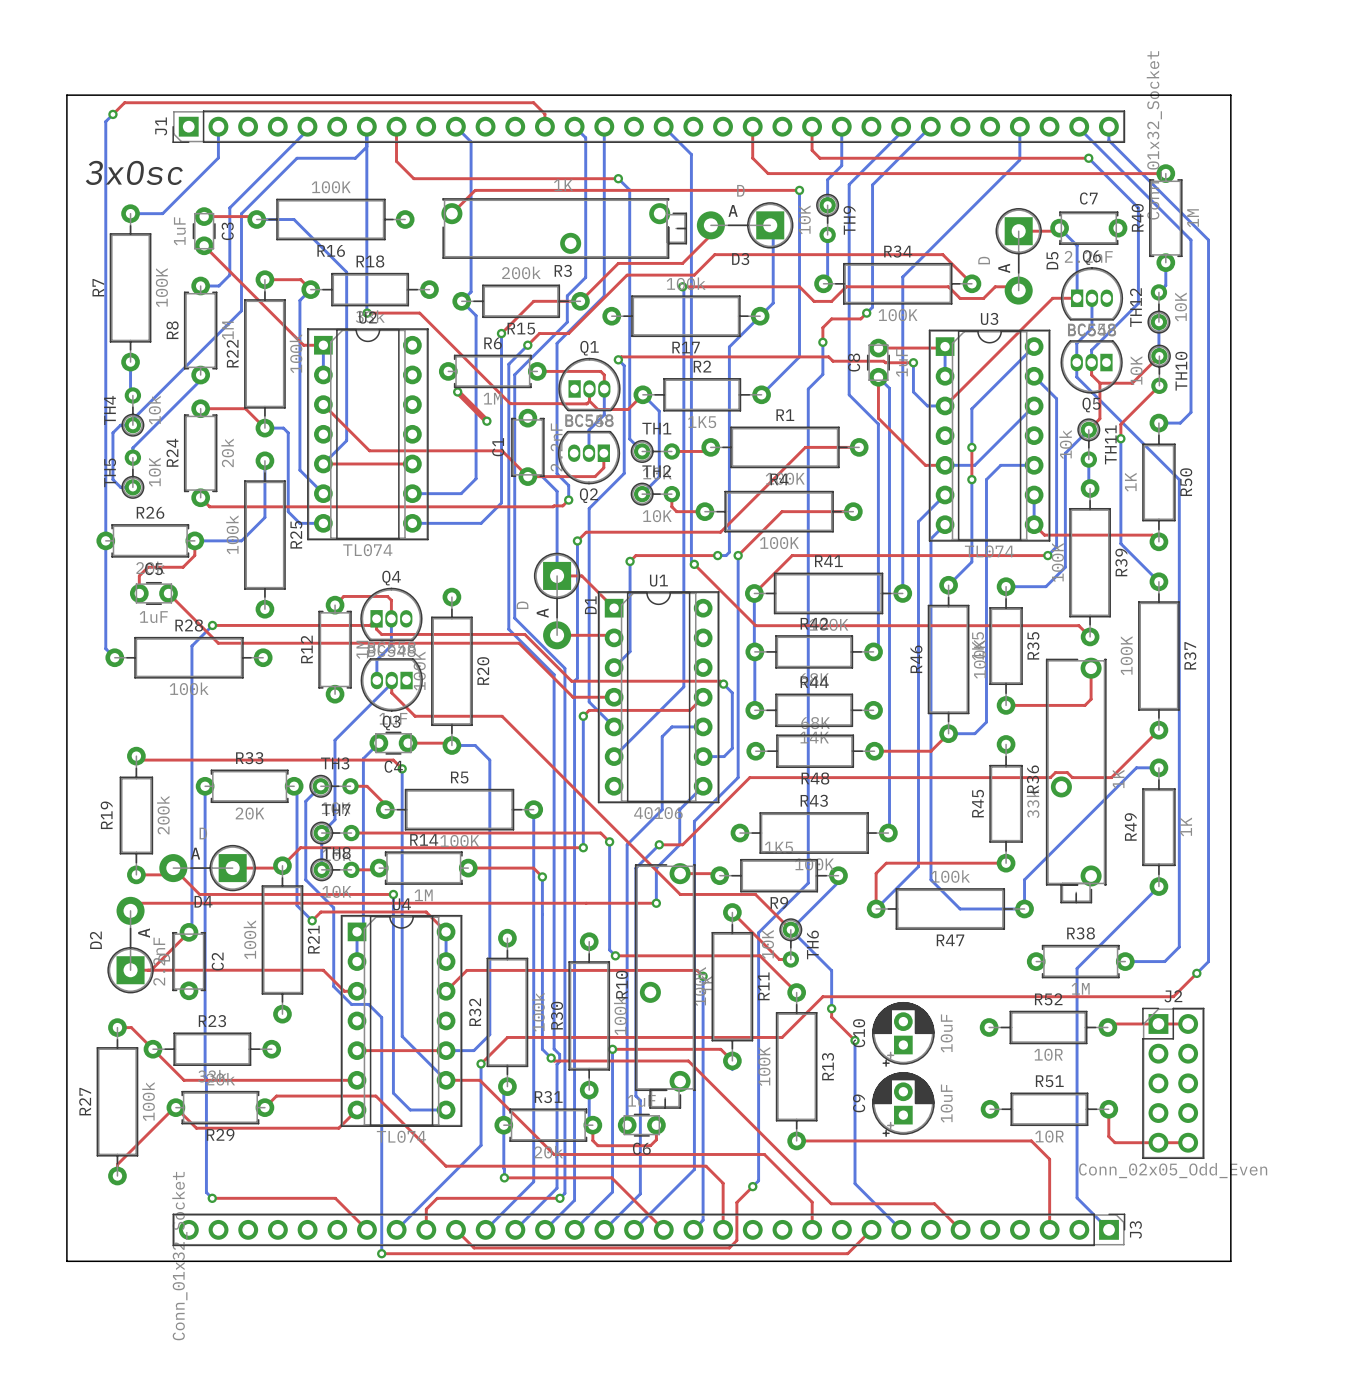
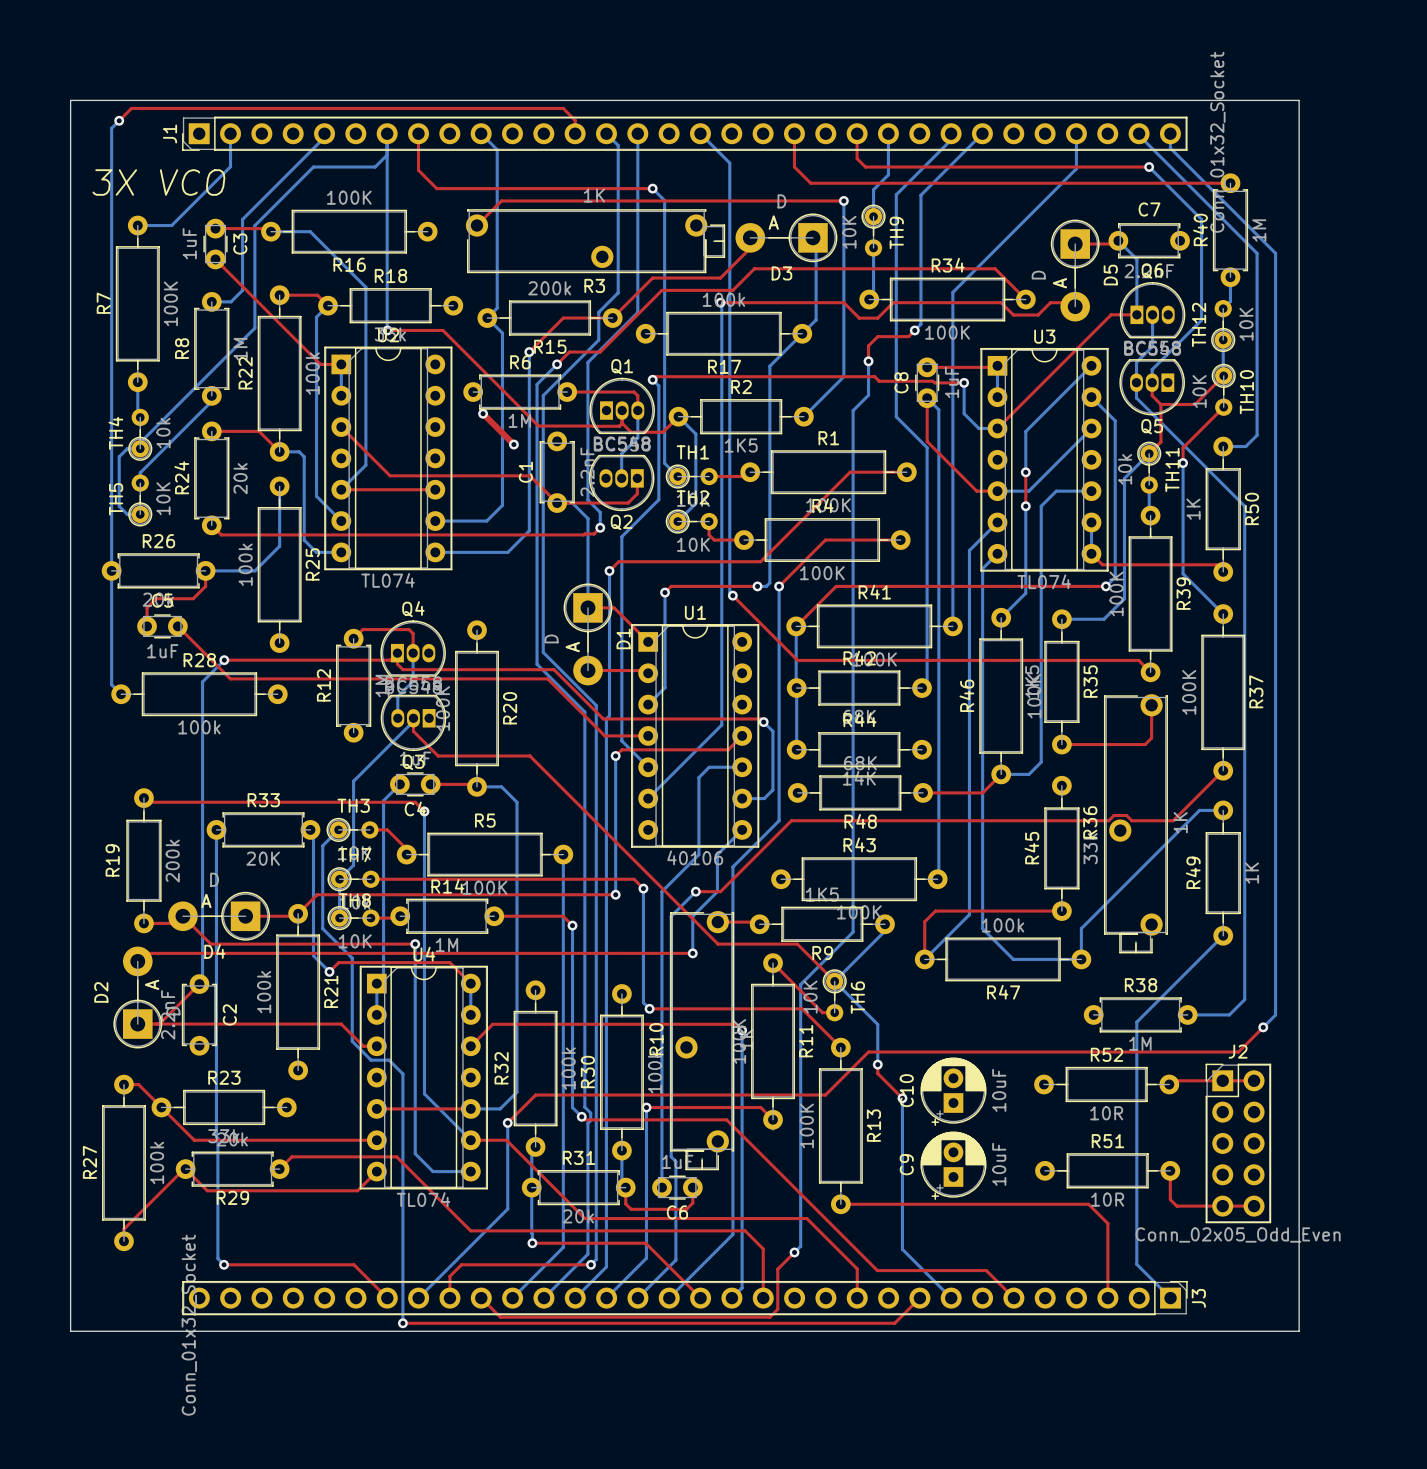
text: 3xOsc (134, 172) -> 3X VCO (158, 182)

